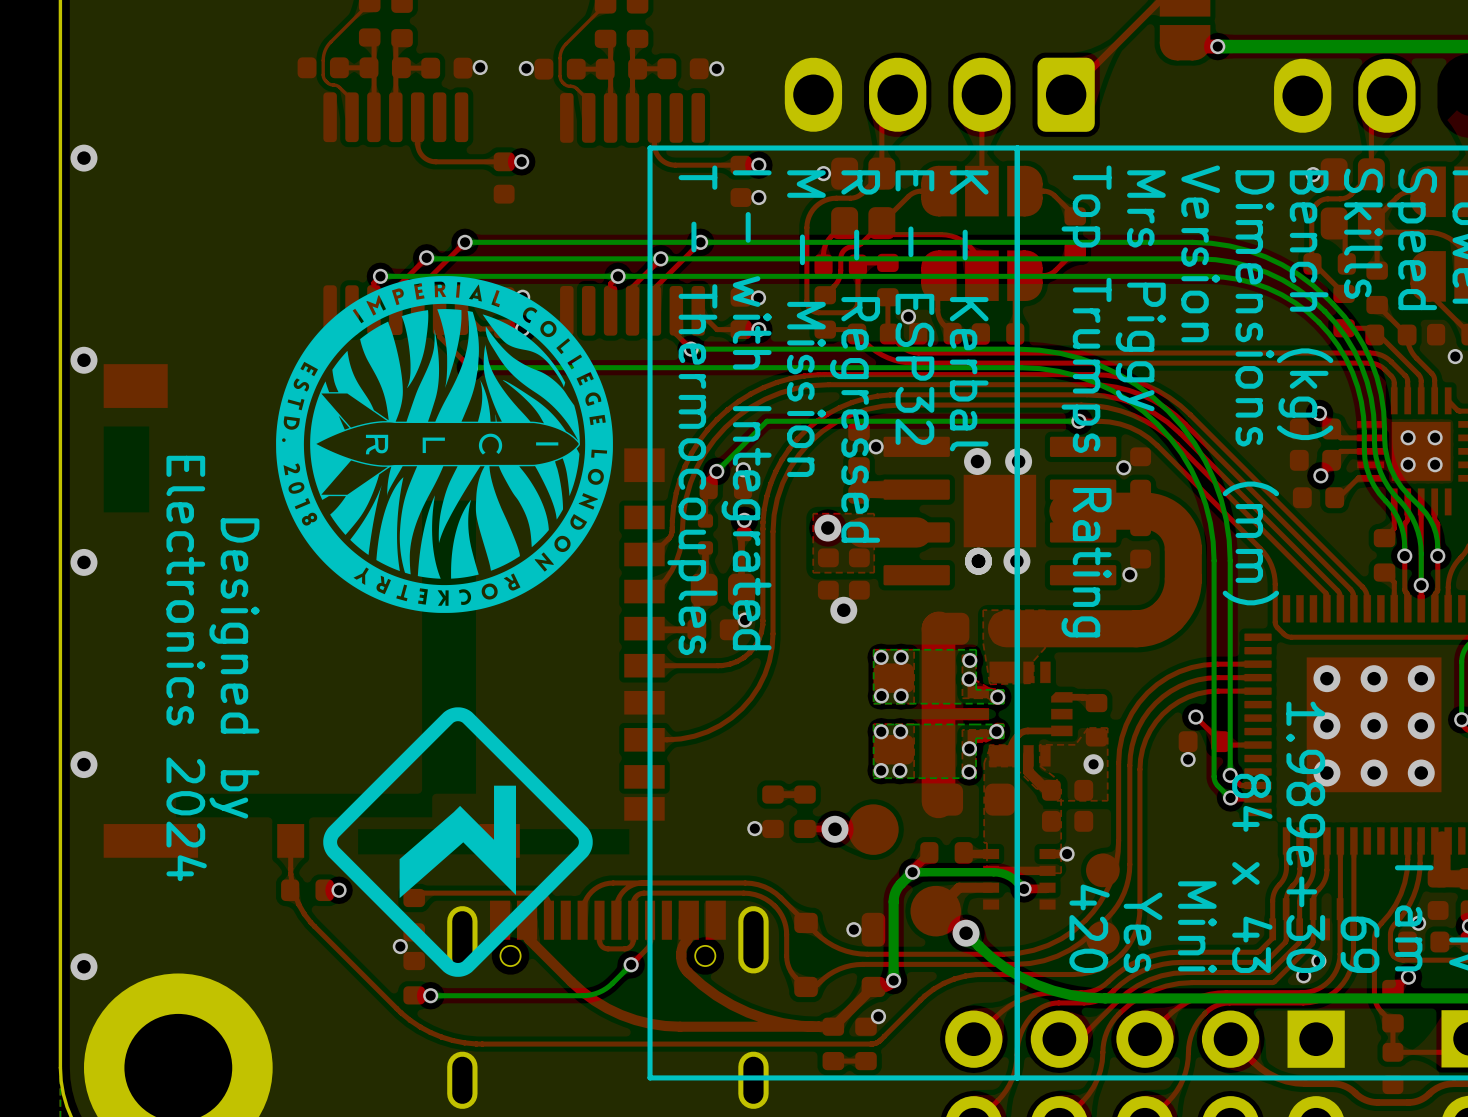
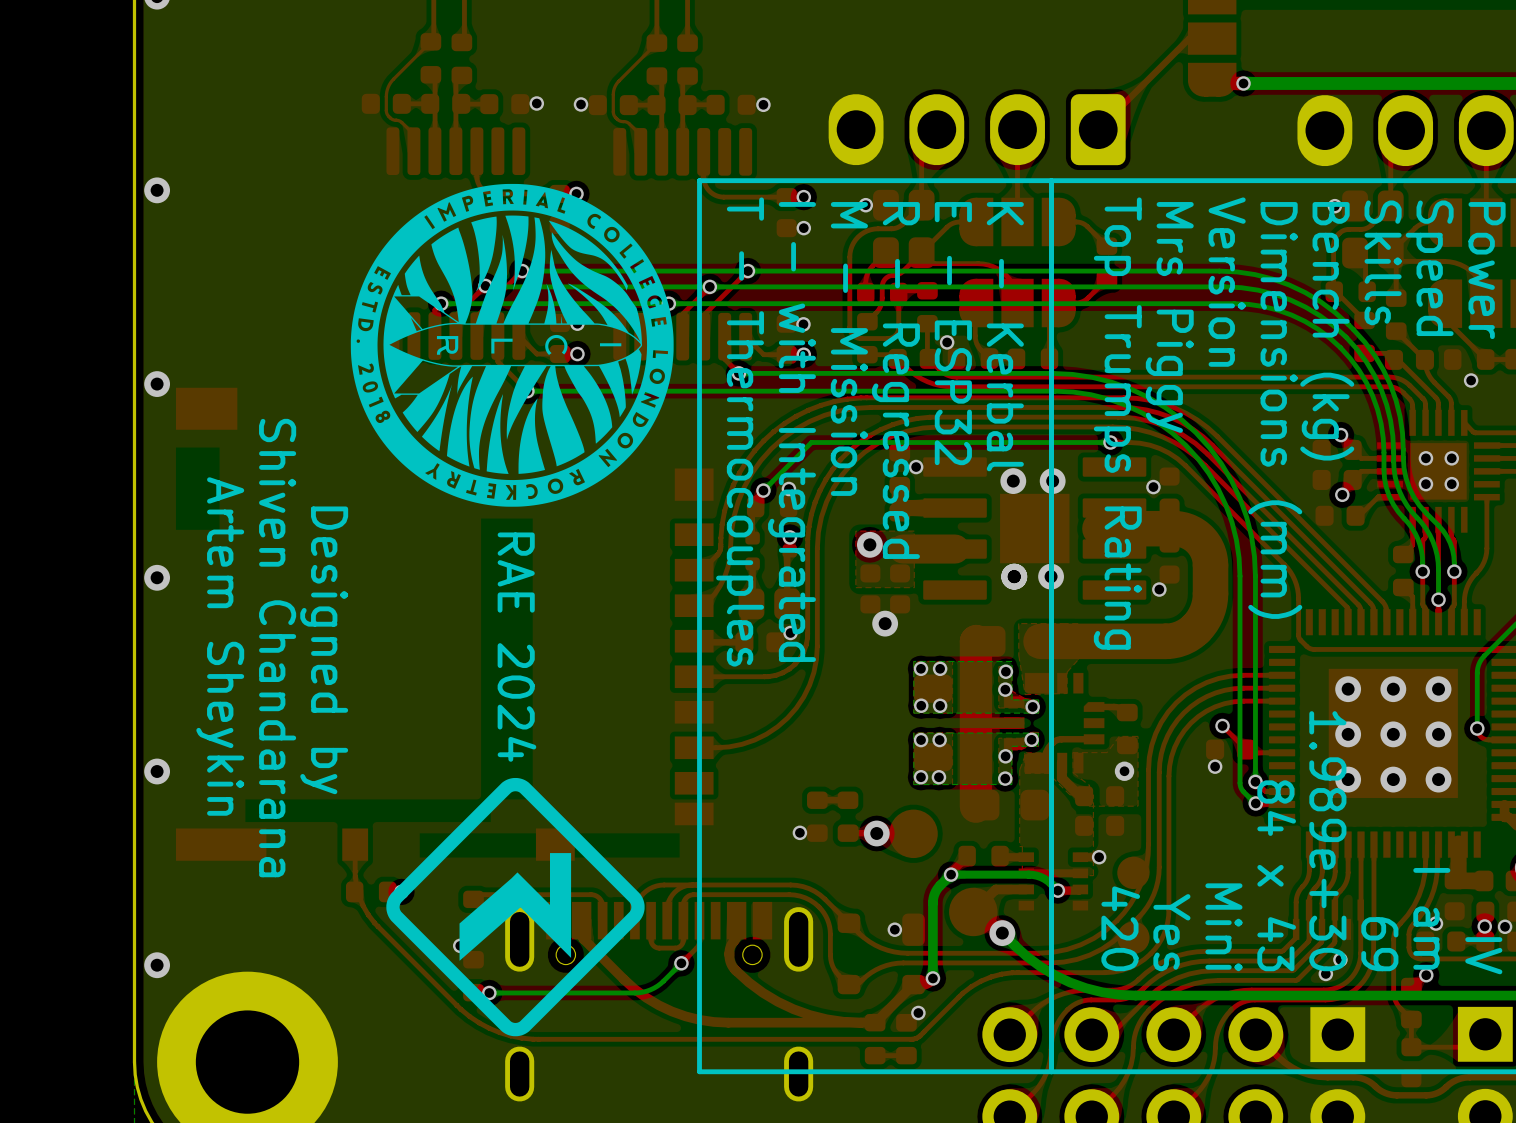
drawing position: (444, 444) -> (512, 345)
text: none -> Artem Sheykin (220, 646)
text: none -> RAE 2024 (516, 647)
text: none -> Shiven Chandarana (277, 648)
text: Electronics 2024 (186, 668) -> none
text position: Designed by (234, 668) -> Designed by (324, 650)
drawing position: (457, 842) -> (515, 907)

